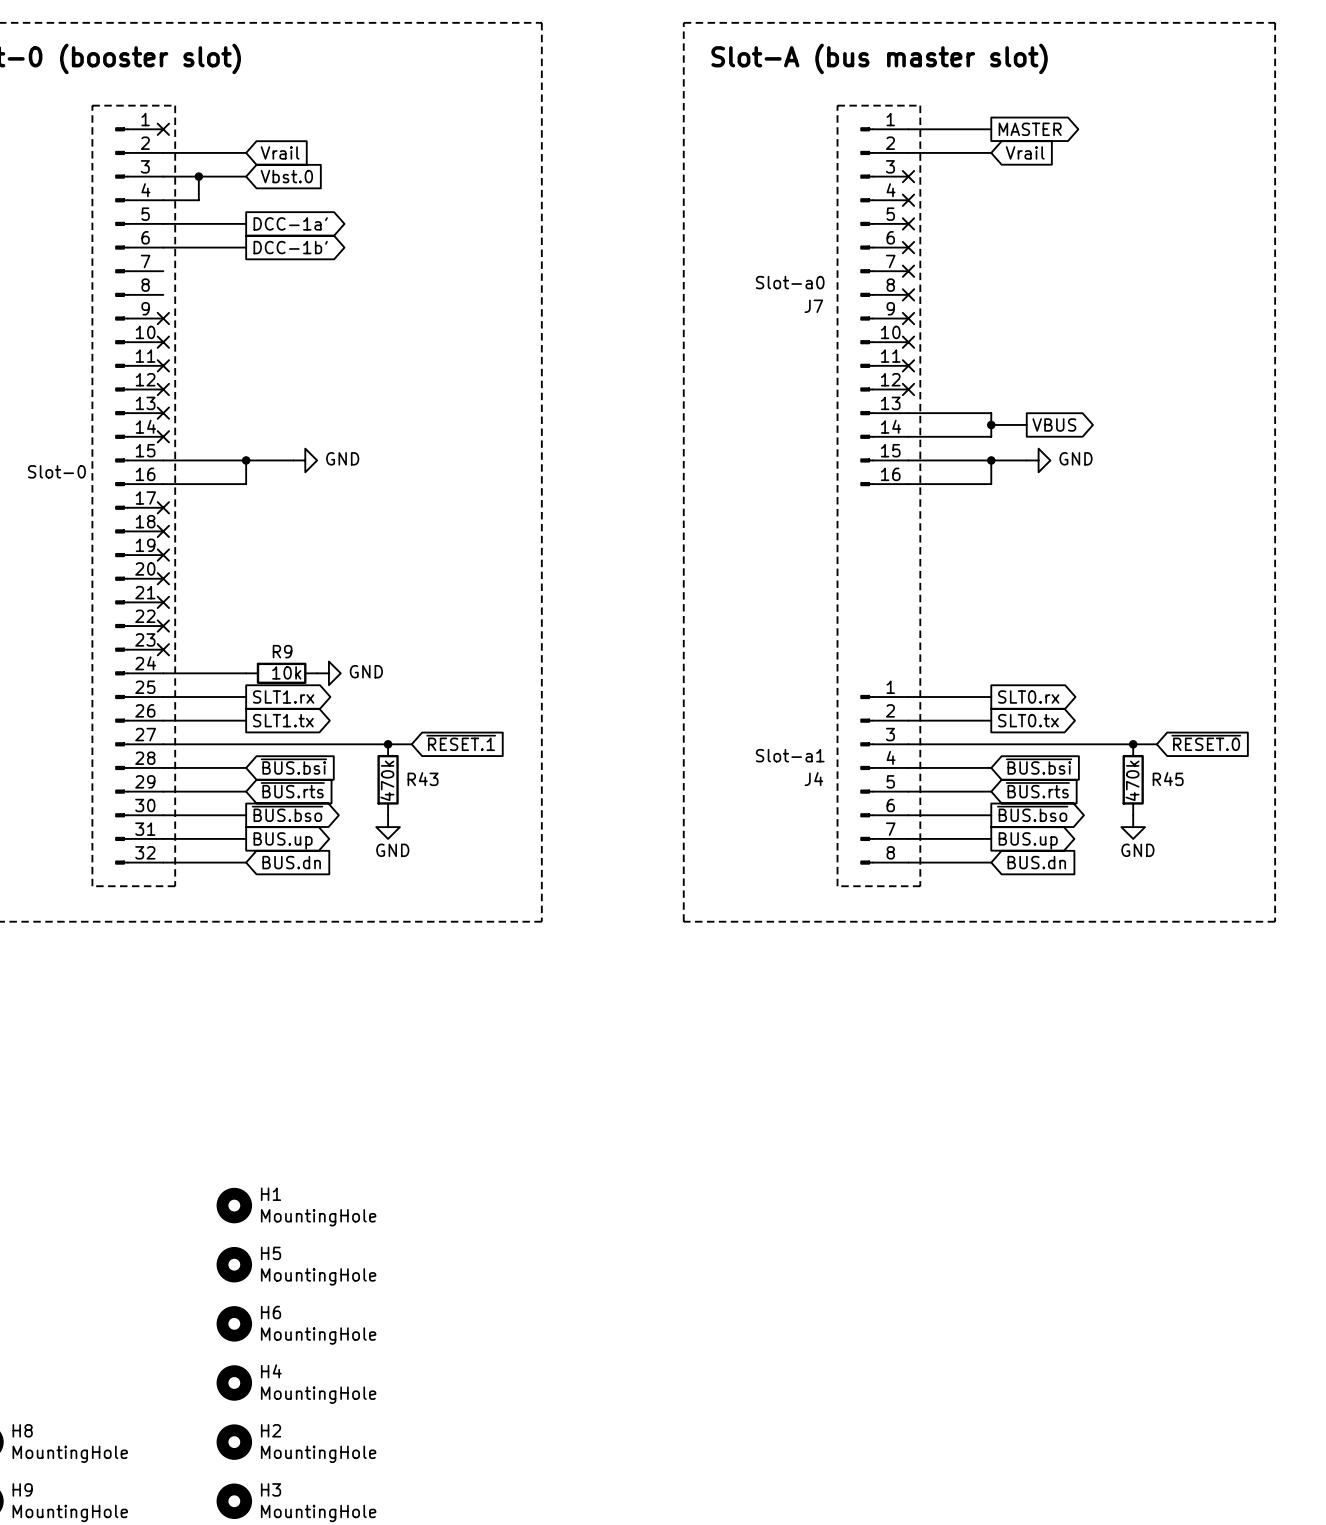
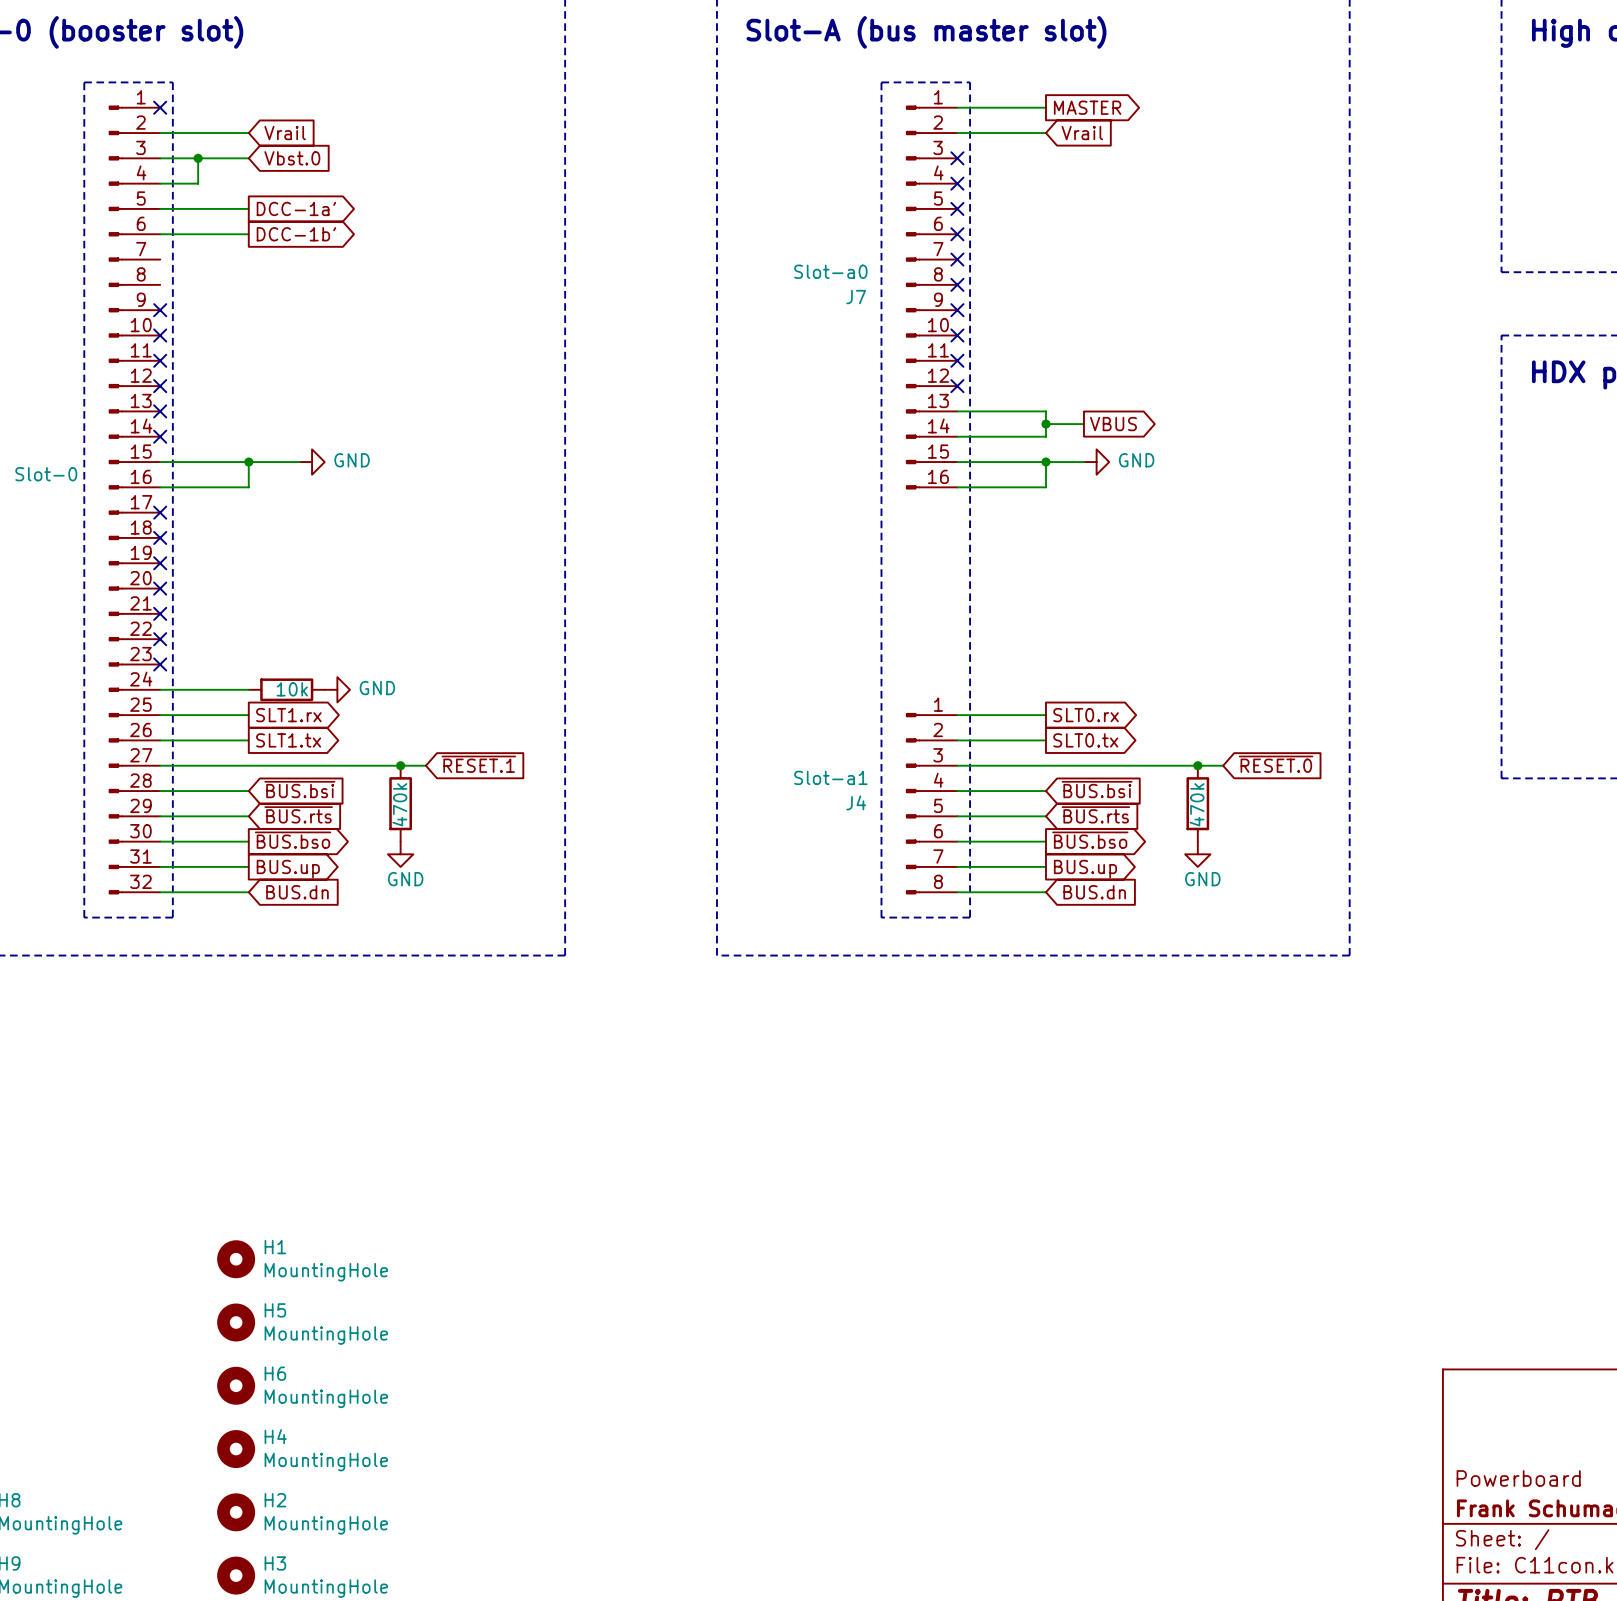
R9 name: R9 (282, 651) -> none
R43 name: R43 (423, 779) -> none
R45 name: R45 (1168, 779) -> none

